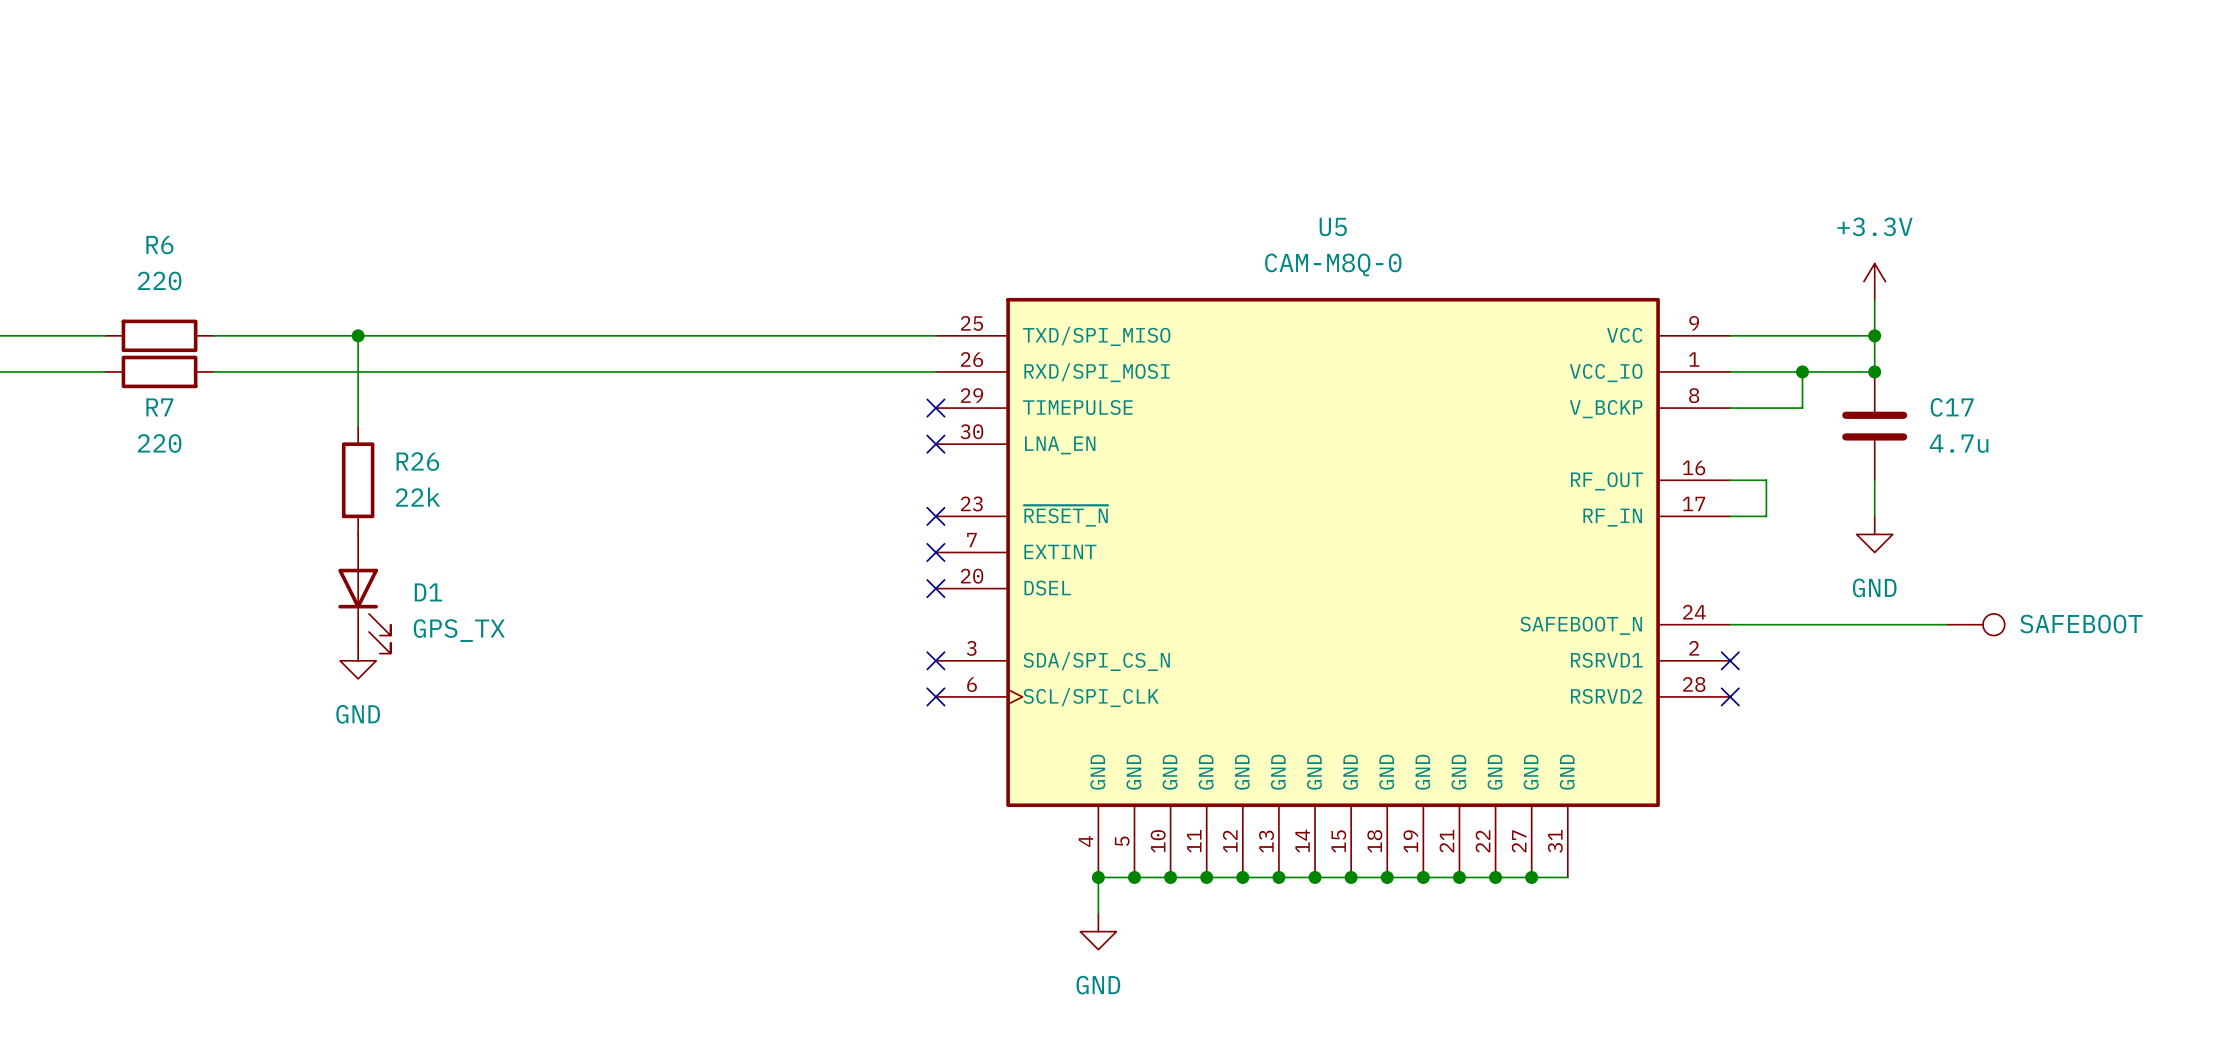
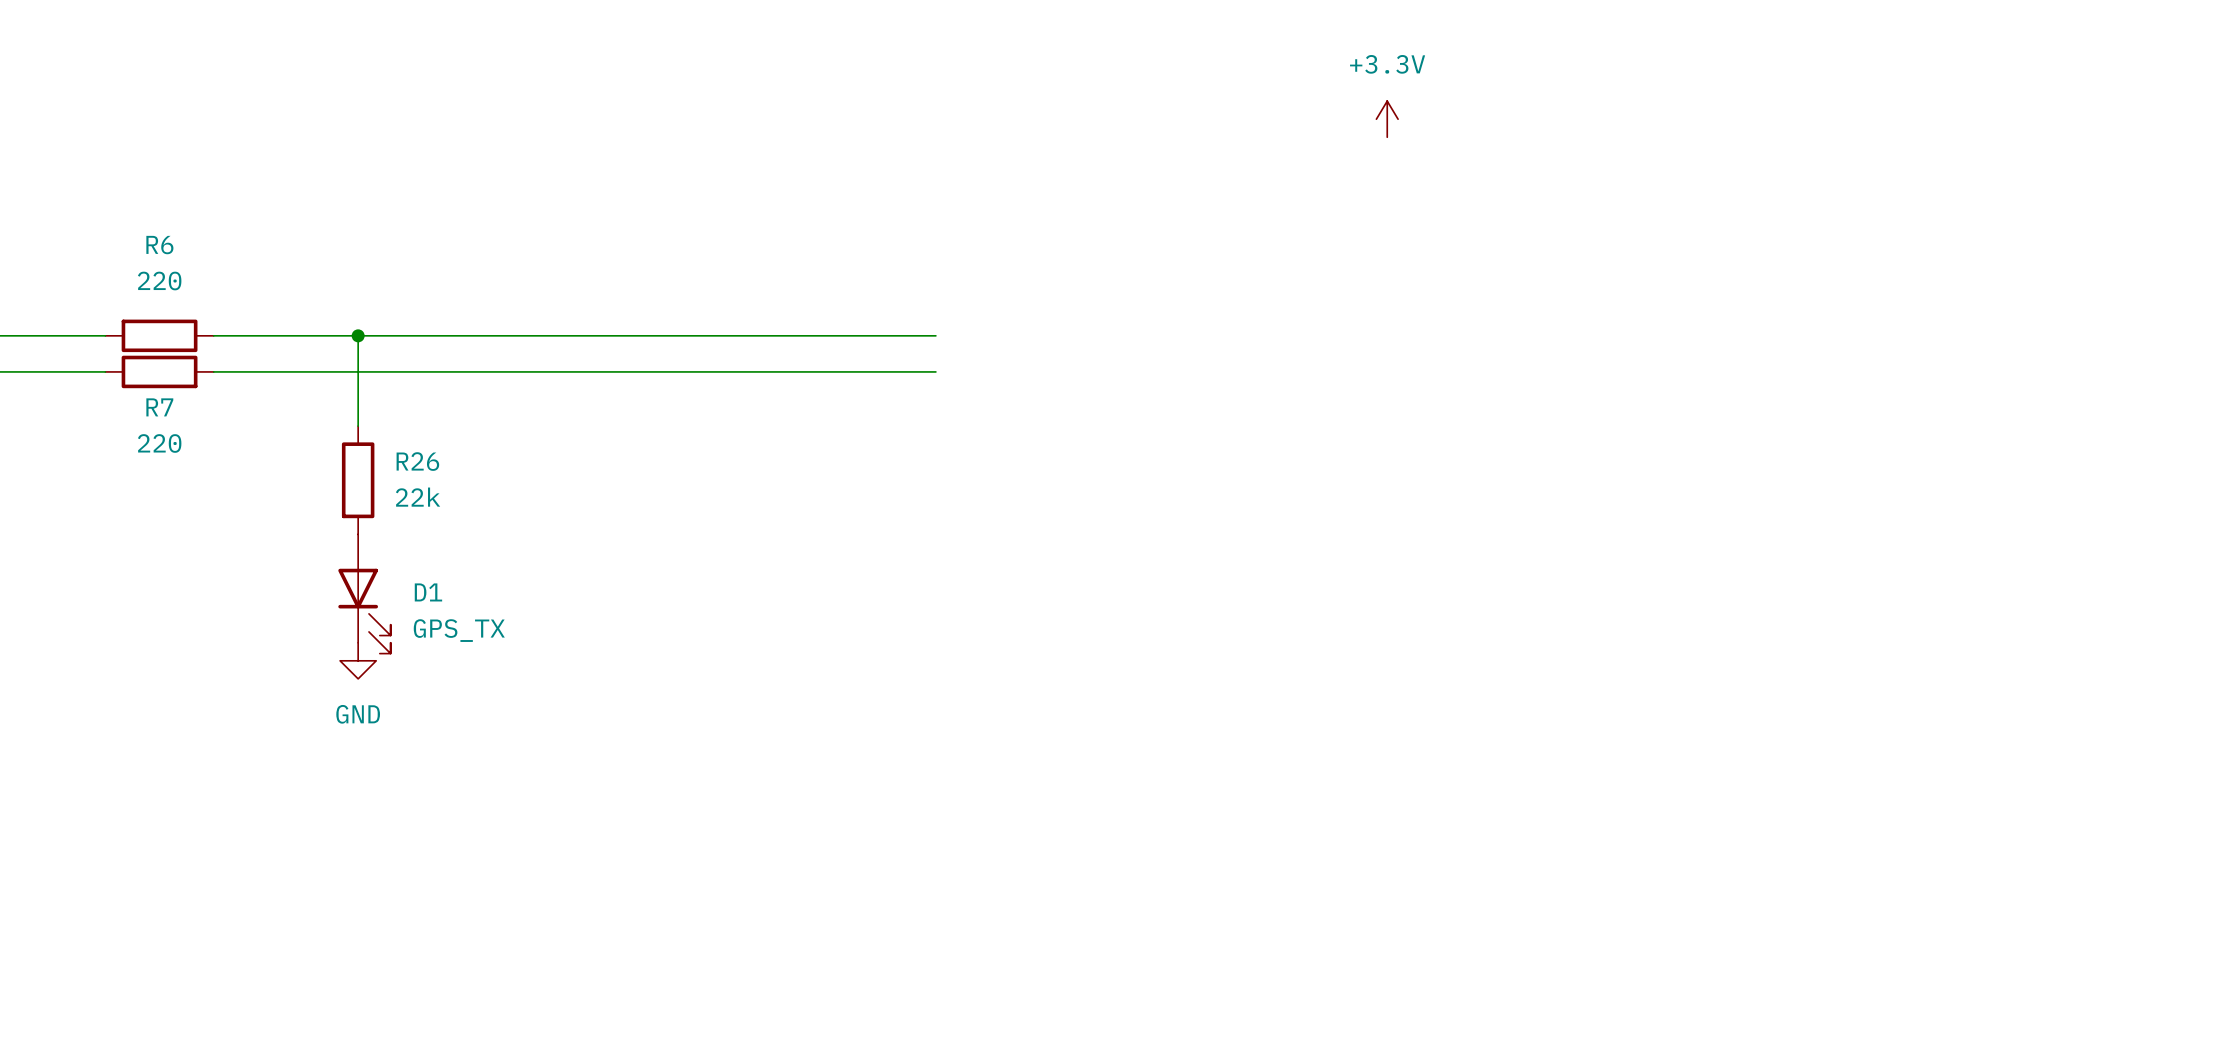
power symbol: none -> +3.3V (1387, 119)
power symbol: +3.3V (1874, 281) -> none
wire: (1874, 299) (1874, 371) (1730, 371) -> none
wire: (1730, 335) (1874, 335) -> none
junction: (1874, 335) -> none
wire: (1802, 371) (1802, 408) (1730, 408) -> none
junction: (1802, 371) -> none
junction: (1874, 371) -> none
no-connect mark: (935, 408) -> none
C17: 4.7u (1874, 426) -> none
no-connect mark: (935, 444) -> none
wire: (1730, 480) (1766, 480) (1766, 516) (1730, 516) -> none
wire: (1874, 480) (1874, 516) -> none
no-connect mark: (935, 516) -> none
power symbol: GND (1874, 534) -> none
no-connect mark: (935, 552) -> none
U5: CAM-M8Q-0 (1333, 587) -> none
no-connect mark: (935, 588) -> none
wire: (1730, 624) (1946, 624) -> none
part: SAFEBOOT (1975, 624) -> none
no-connect mark: (935, 660) -> none
no-connect mark: (1730, 660) -> none
no-connect mark: (935, 696) -> none
no-connect mark: (1730, 696) -> none
junction: (1098, 877) -> none
junction: (1134, 877) -> none
junction: (1170, 877) -> none
junction: (1206, 877) -> none
junction: (1242, 877) -> none
junction: (1278, 877) -> none
junction: (1315, 877) -> none
junction: (1351, 877) -> none
junction: (1387, 877) -> none
junction: (1423, 877) -> none
junction: (1459, 877) -> none
junction: (1495, 877) -> none
junction: (1531, 877) -> none
wire: (1567, 877) (1098, 877) (1098, 913) -> none
power symbol: GND (1098, 931) -> none

